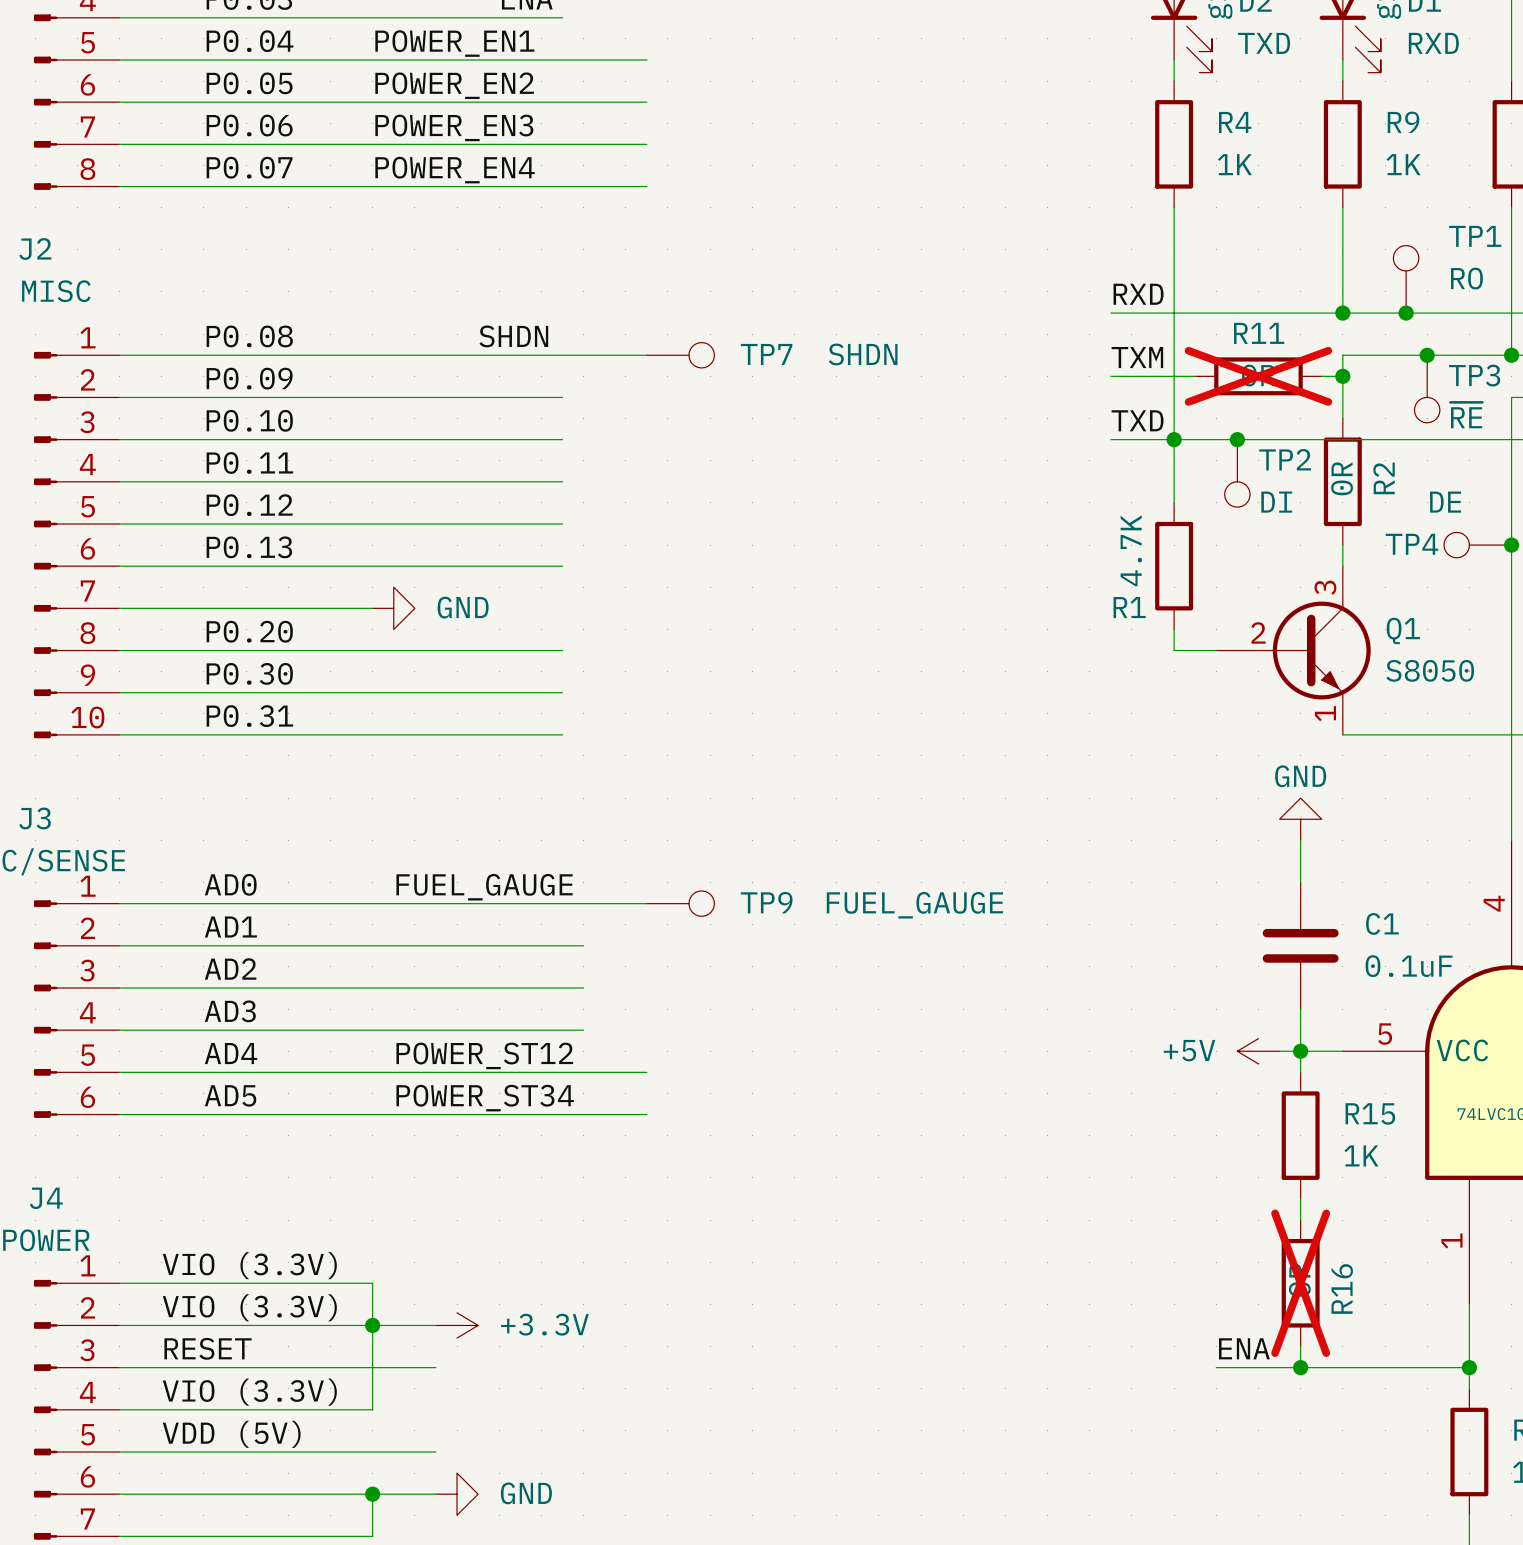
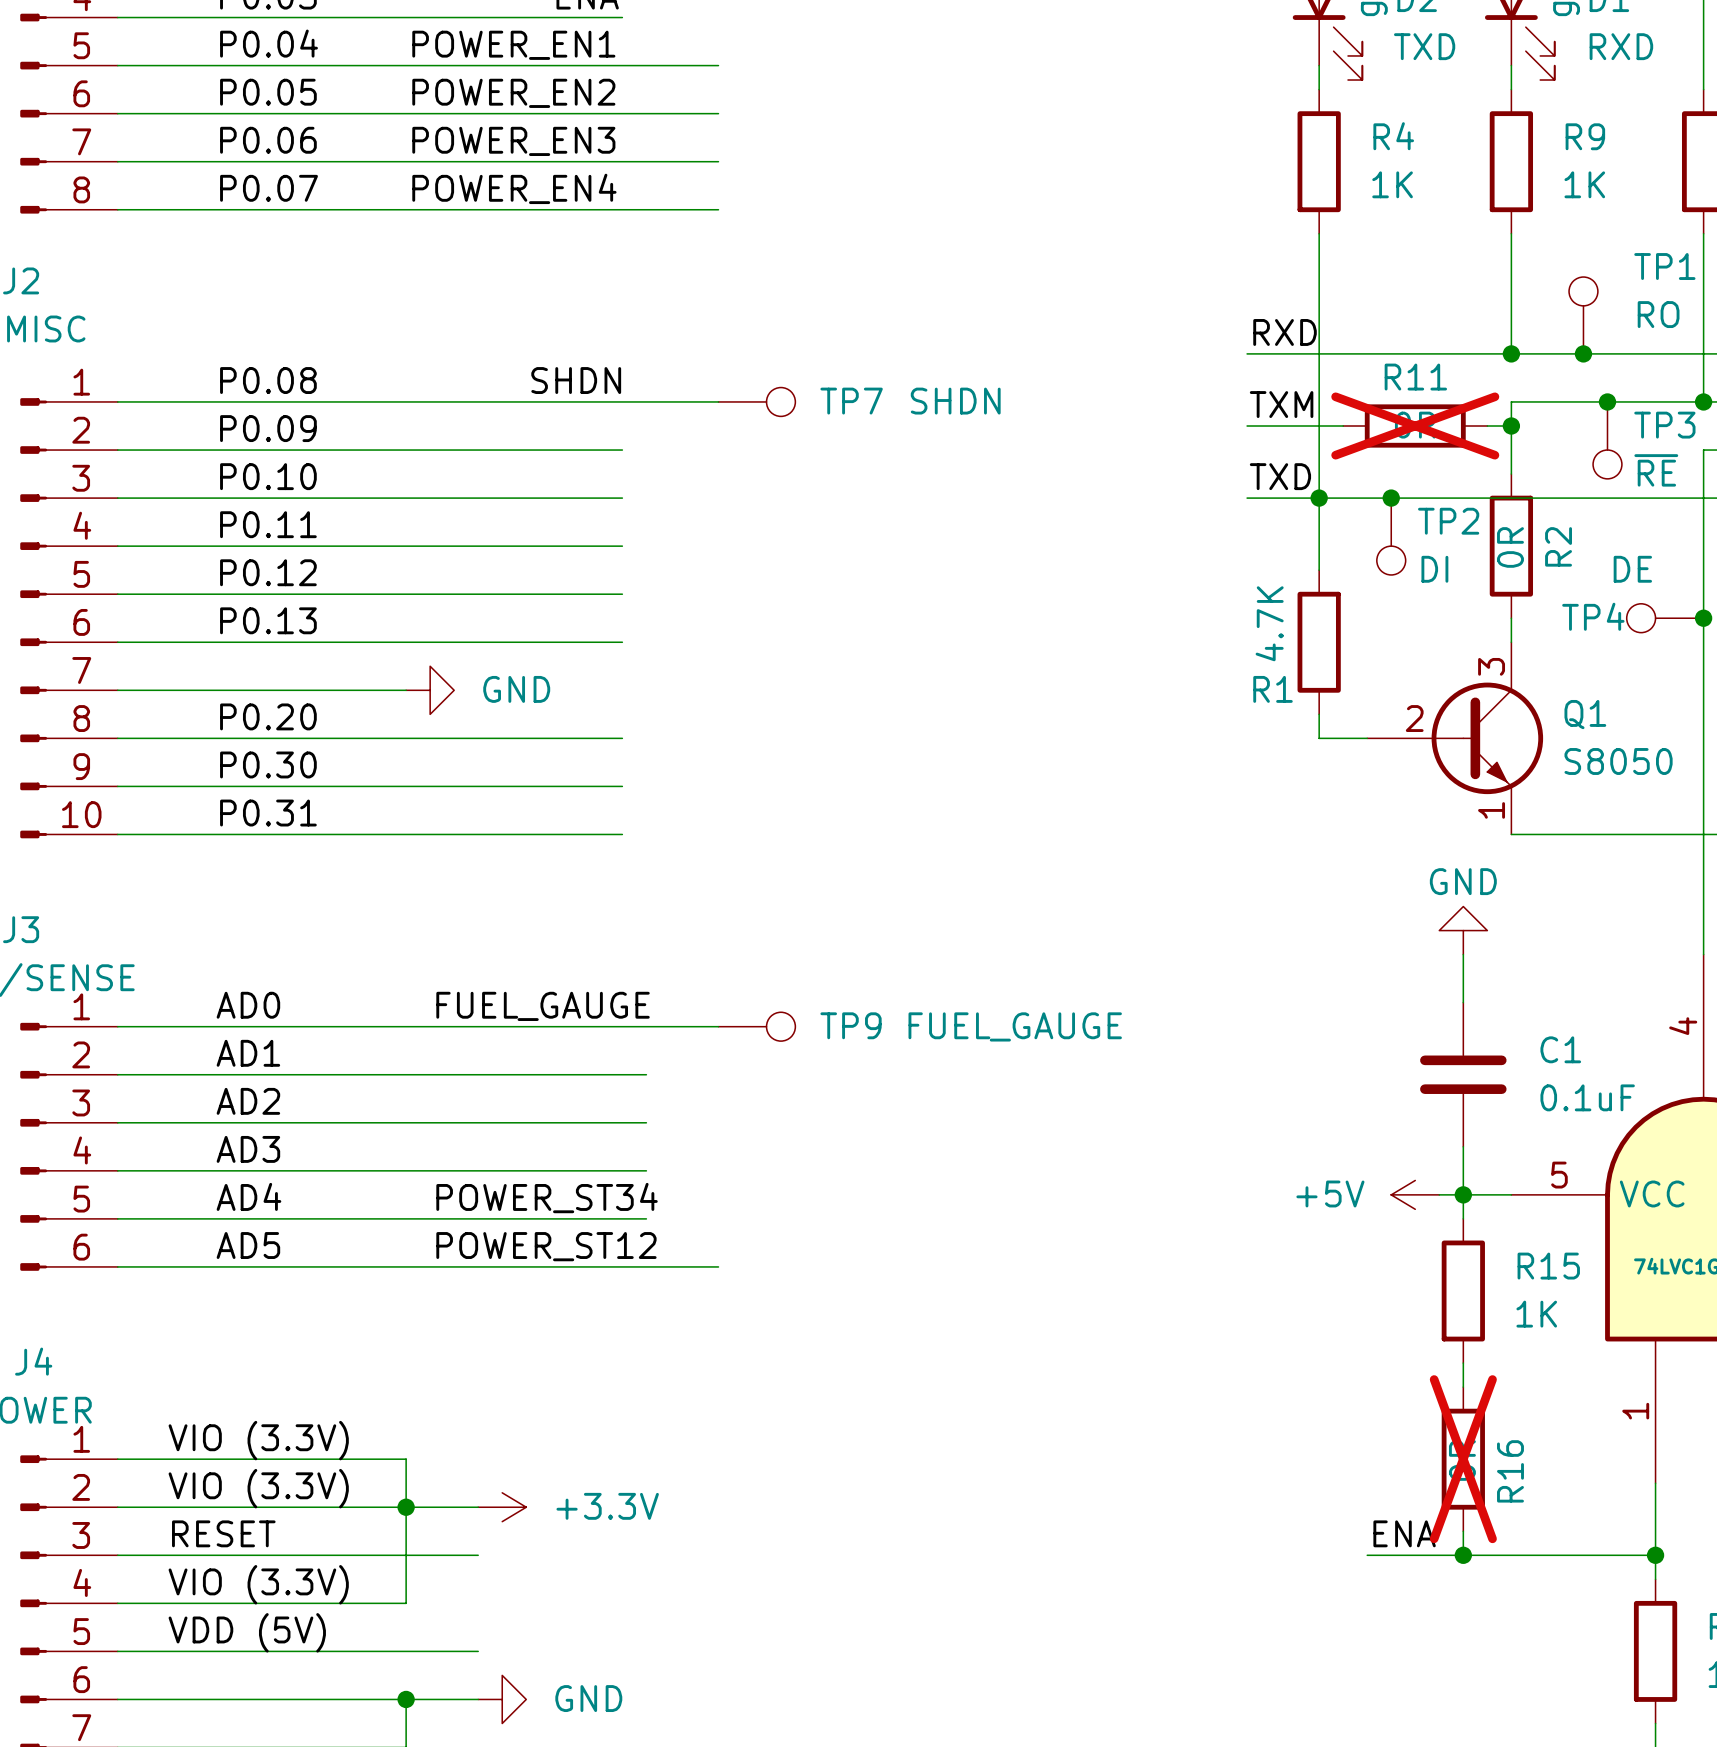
label: POWER_ST12 (484, 1055) -> POWER_ST34 (547, 1198)
wire: (583, 1072) (646, 1072) -> none
label: POWER_ST34 (485, 1098) -> POWER_ST12 (546, 1246)

